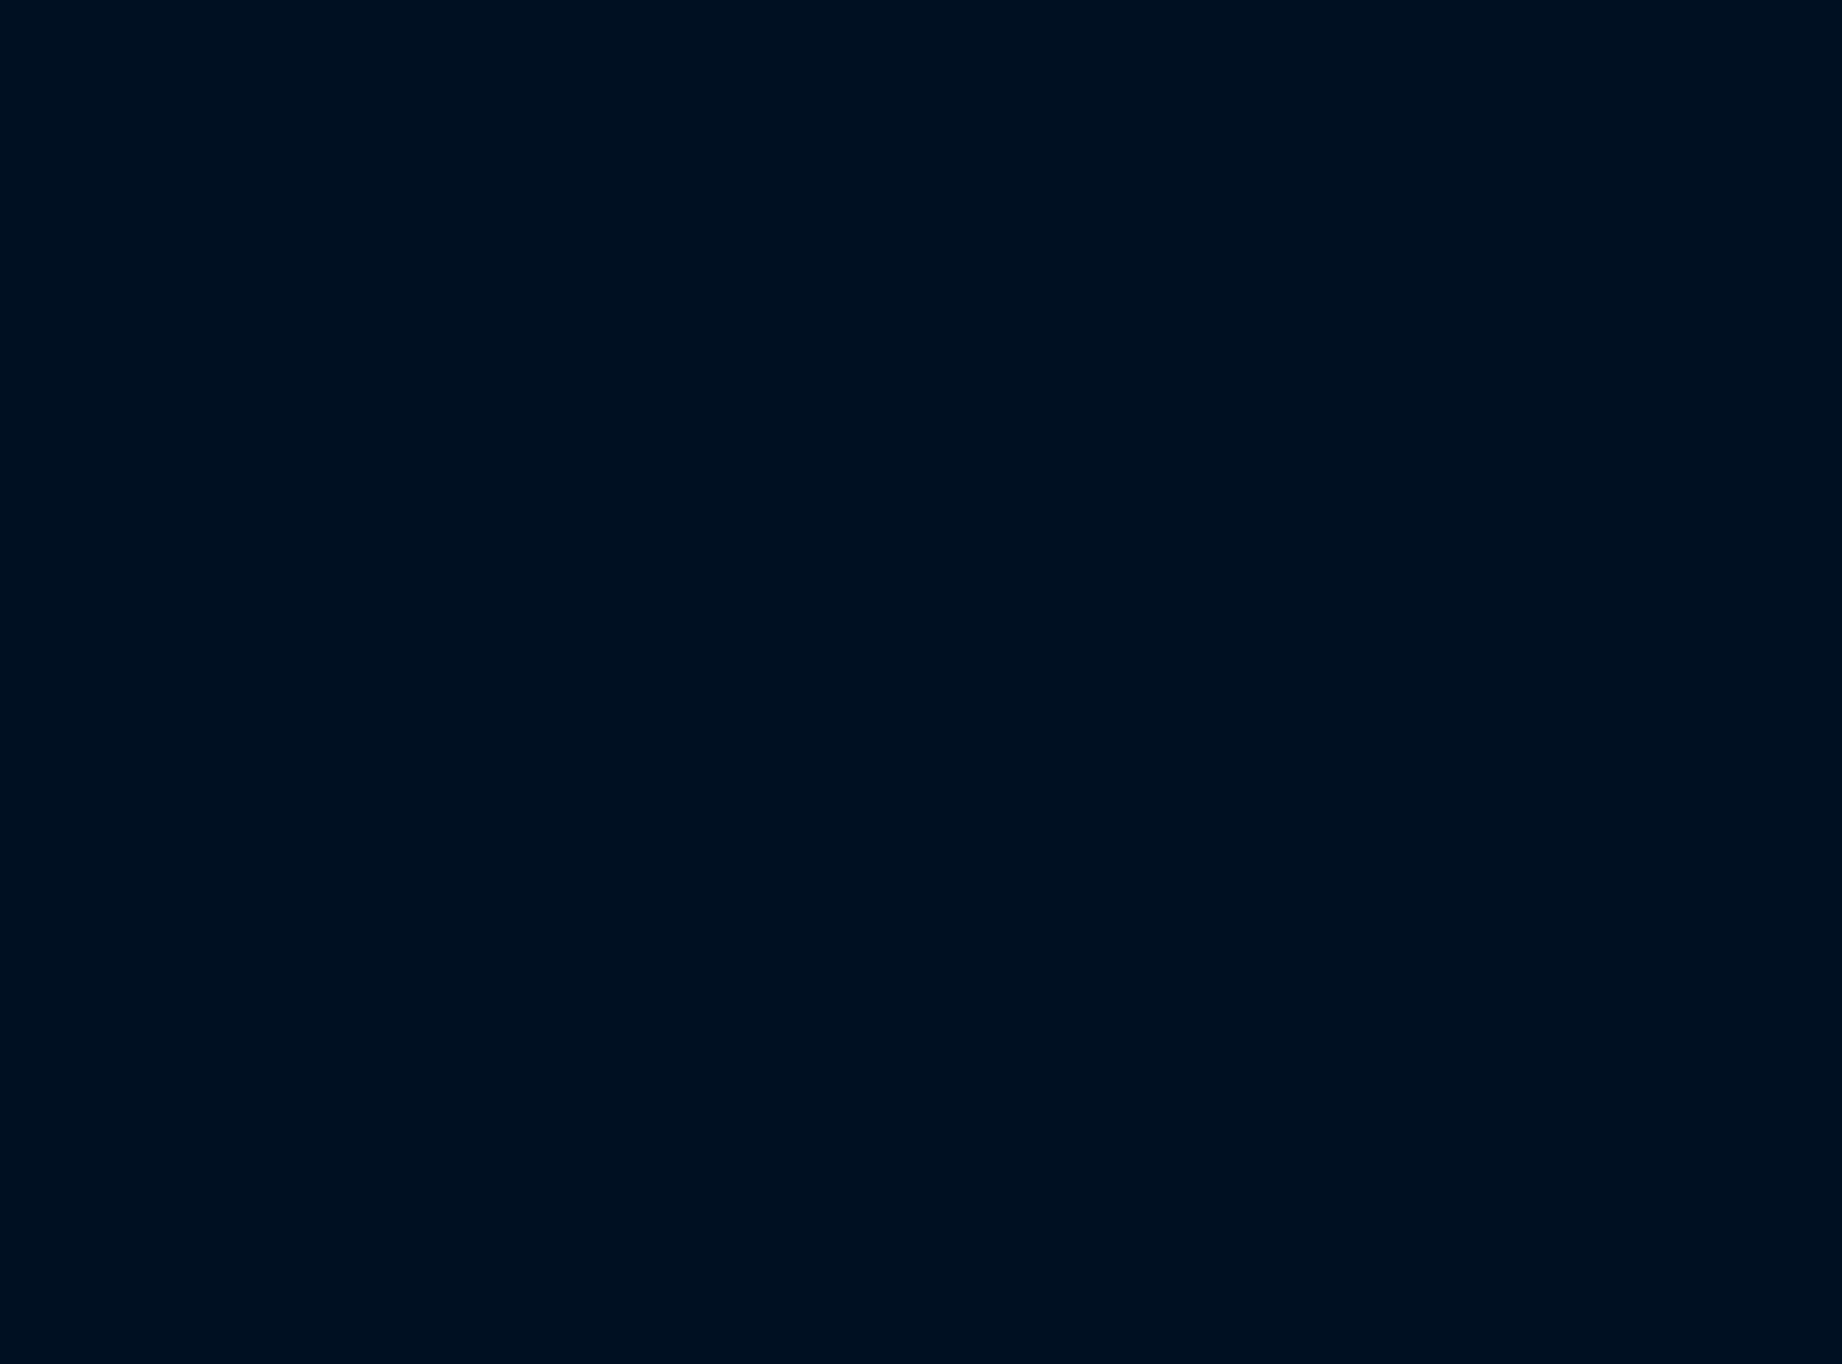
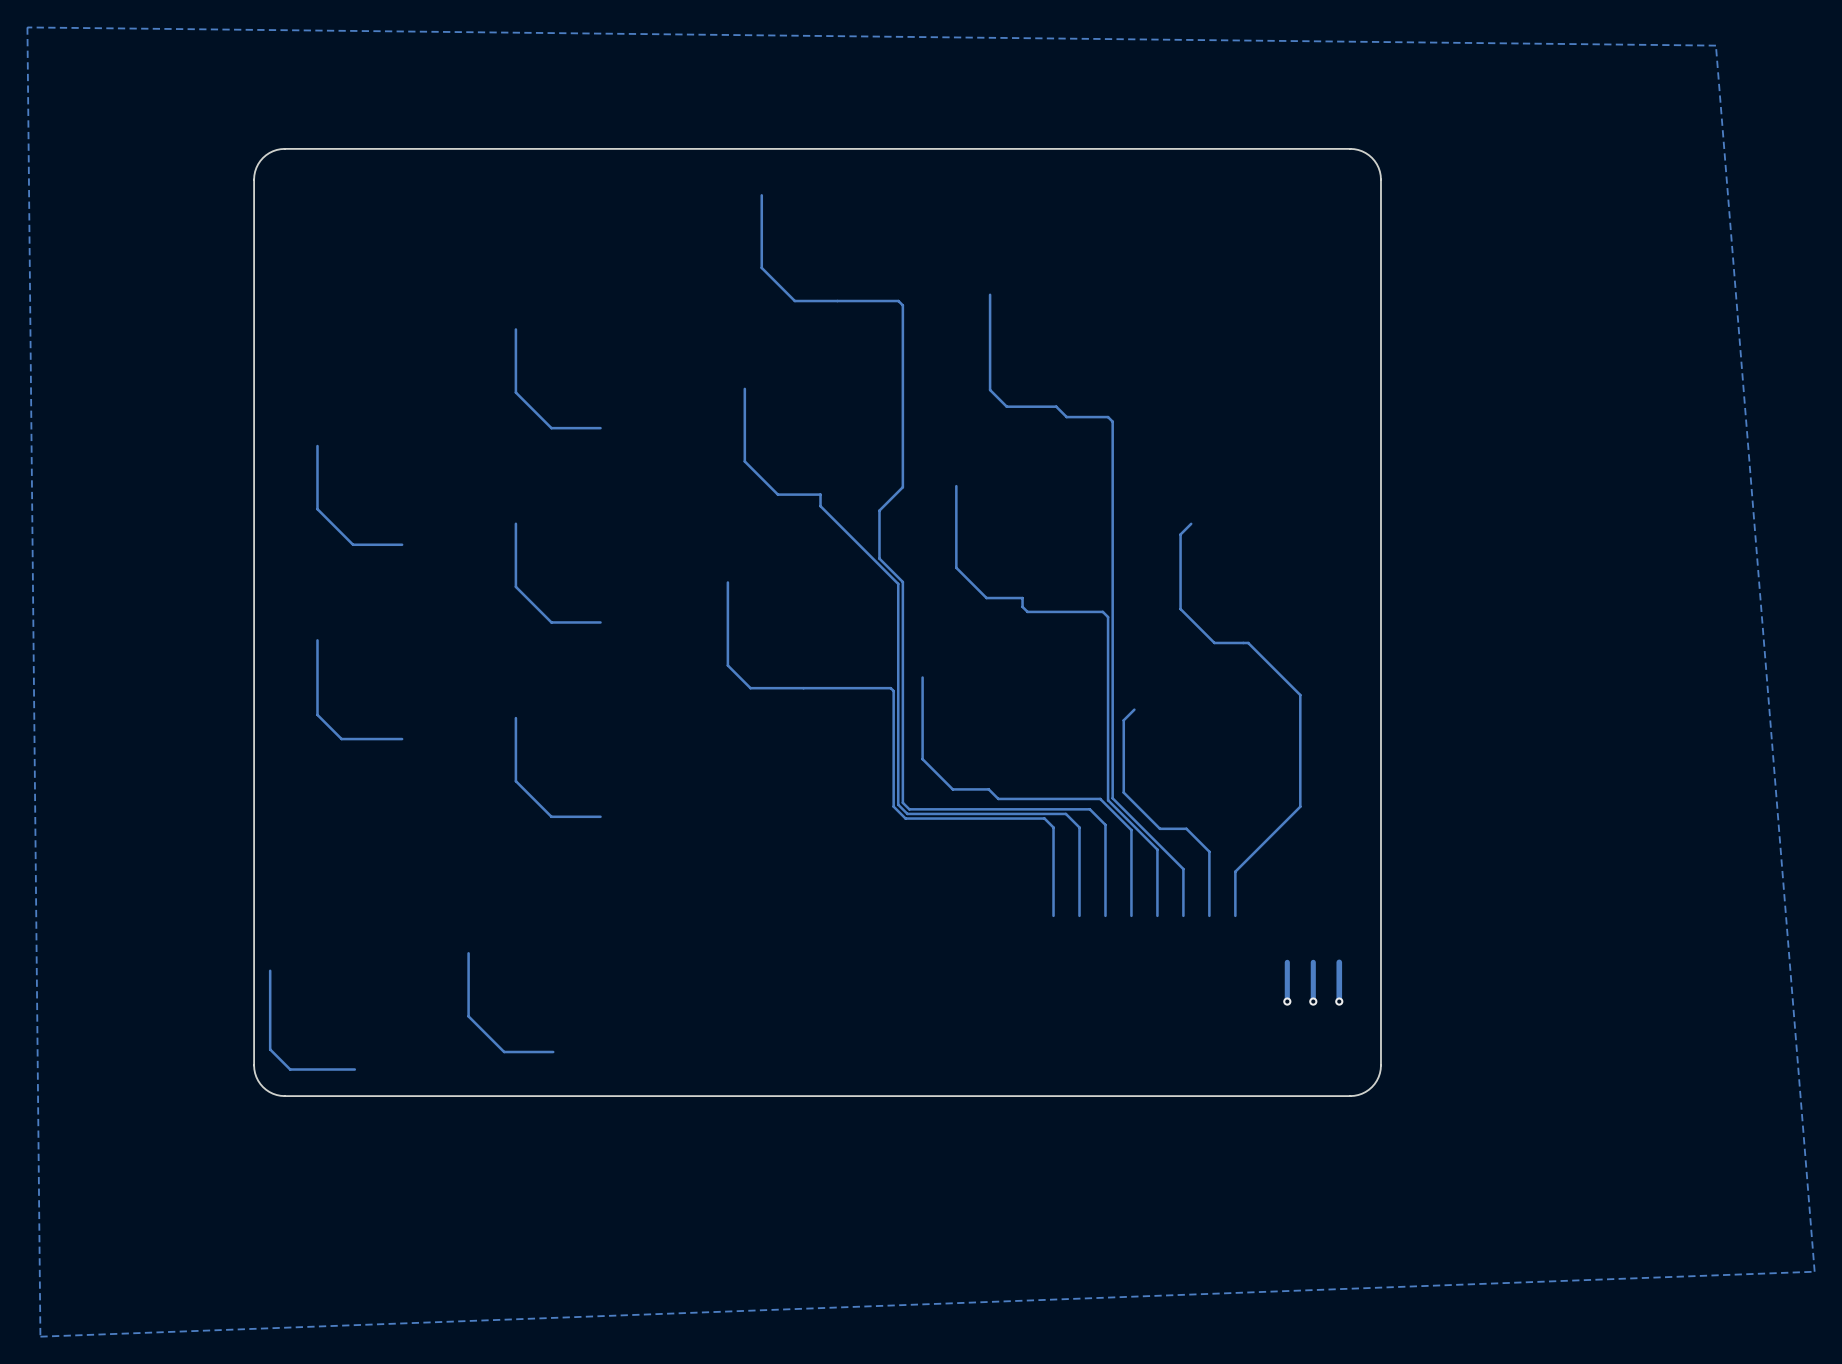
zone outline: none -> (27, 27) (1715, 45) (1814, 1271) (40, 1336) (27, 27)
board edge: none -> (1350, 148) (284, 148) (276, 149) (266, 155) (258, 164) (254, 179) (254, 1065) (255, 1073) (260, 1084) (273, 1093) (284, 1096) (1350, 1096) (1362, 1093) (1368, 1089) (1376, 1080) (1380, 1065) (1380, 179) (1378, 167) (1372, 157) (1362, 151) (1350, 148)
track: none -> (761, 195) (761, 267) (794, 301) (898, 301) (902, 305) (902, 487) (879, 510) (879, 558) (902, 582) (902, 802) (909, 809) (1089, 809) (1105, 824) (1105, 915)
track: none -> (990, 294) (990, 390) (1006, 406) (1056, 406) (1066, 417) (1108, 417) (1112, 421) (1112, 798) (1183, 869) (1183, 915)
track: none -> (515, 329) (515, 392) (551, 428) (600, 428)
track: none -> (744, 388) (744, 461) (777, 494) (820, 494) (820, 506) (898, 583) (898, 804) (907, 813) (1065, 813) (1079, 827) (1079, 915)
track: none -> (317, 446) (317, 509) (353, 544) (402, 544)
track: none -> (956, 486) (956, 567) (986, 598) (1022, 598) (1022, 606) (1027, 611) (1102, 611) (1108, 617) (1108, 800) (1157, 849) (1157, 915)
track: none -> (515, 523) (515, 586) (551, 622) (600, 622)
track: none -> (1191, 523) (1180, 534) (1180, 609) (1214, 642) (1248, 642) (1300, 695) (1300, 806) (1235, 871) (1235, 915)
track: none -> (727, 582) (727, 665) (750, 688) (890, 688) (893, 691) (893, 806) (905, 818) (1044, 818) (1053, 827) (1053, 915)
track: none -> (317, 640) (317, 714) (341, 739) (402, 739)
track: none -> (922, 677) (922, 759) (952, 789) (988, 789) (998, 798) (1100, 798) (1131, 830) (1131, 915)
track: none -> (1134, 709) (1123, 720) (1123, 792) (1159, 828) (1186, 828) (1209, 851) (1209, 915)
track: none -> (515, 718) (515, 781) (551, 816) (600, 816)
track: none -> (468, 953) (468, 1016) (504, 1052) (553, 1052)
track: none -> (1287, 962) (1287, 1001)
track: none -> (1313, 962) (1313, 1001)
track: none -> (1339, 962) (1339, 1001)
track: none -> (270, 970) (270, 1049) (290, 1069) (354, 1069)
via: none -> (1287, 1001)
via: none -> (1313, 1001)
via: none -> (1339, 1001)

